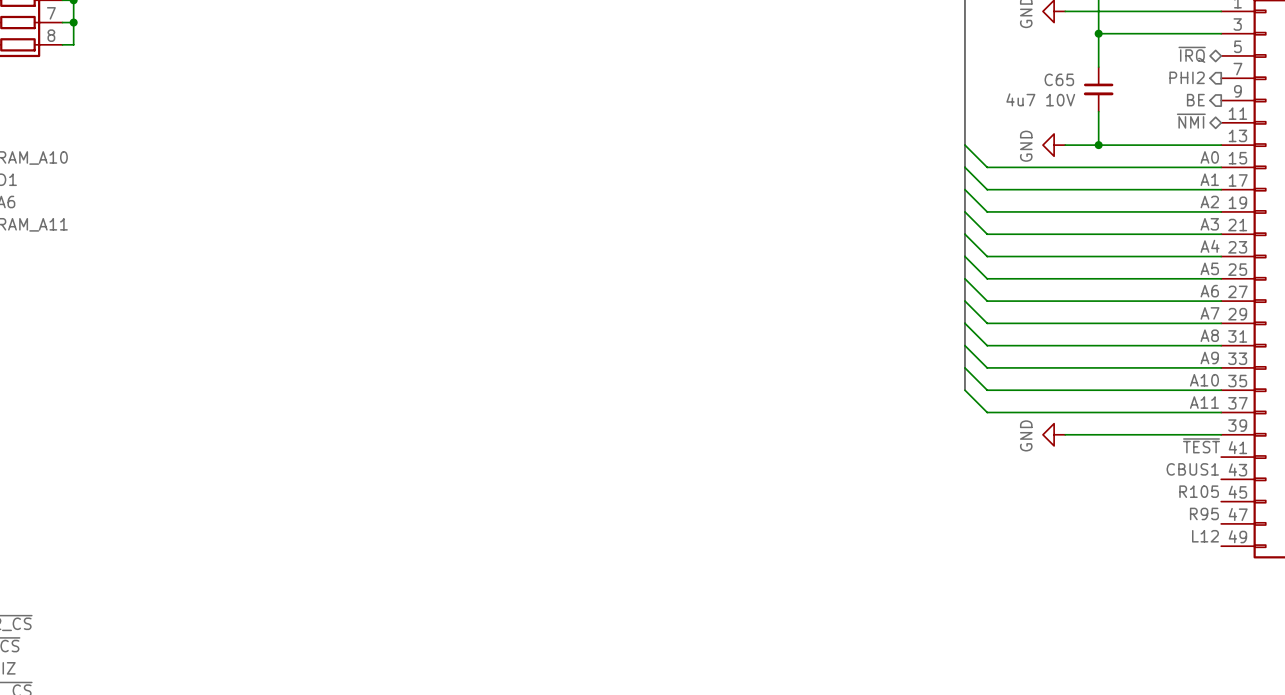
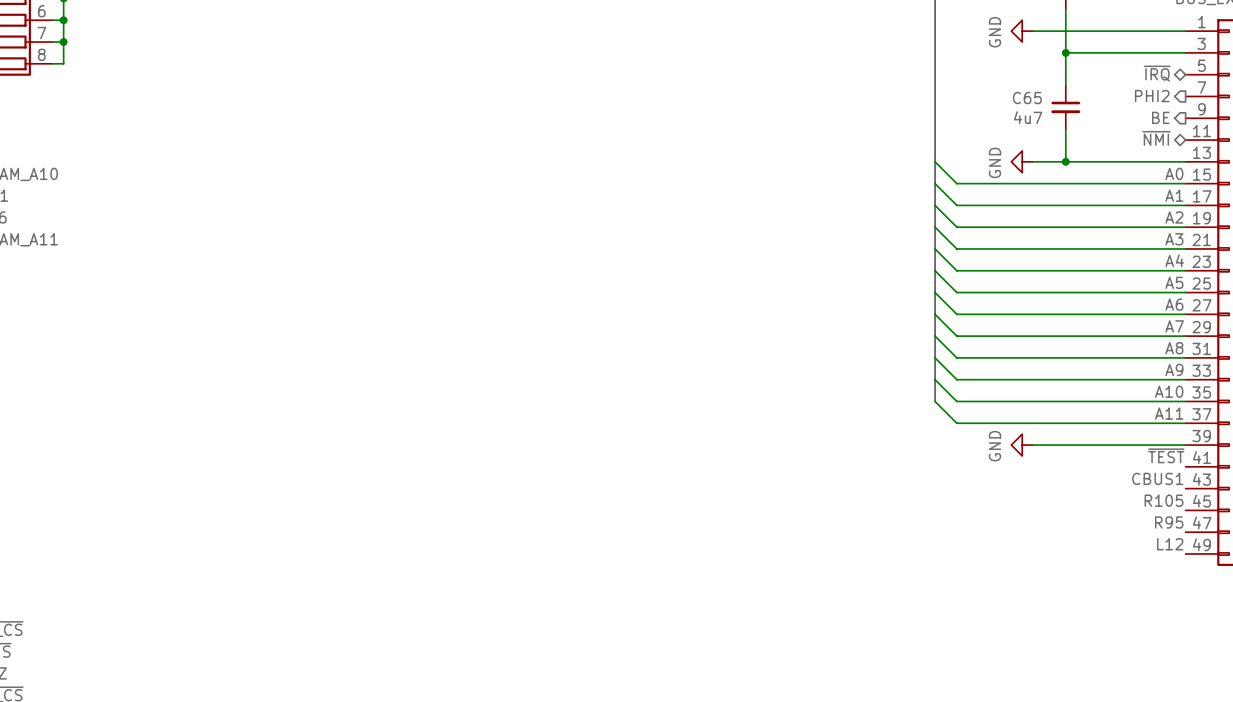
C65 value: 4u7 10V (1040, 99) -> 4u7 (1028, 117)

